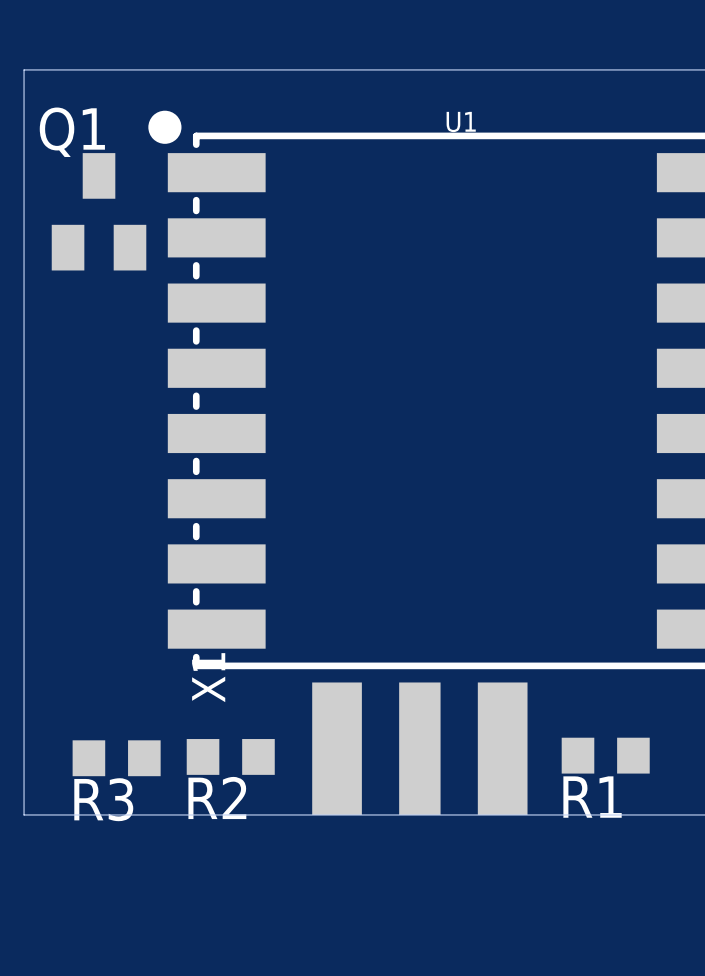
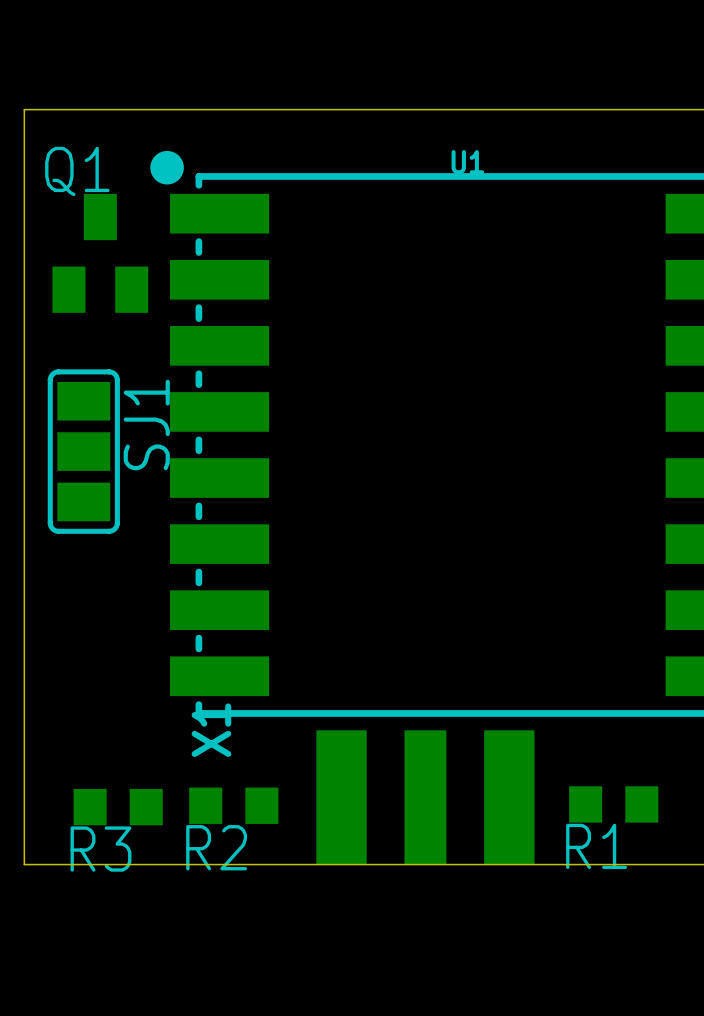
SJ1: none -> (83, 451)

